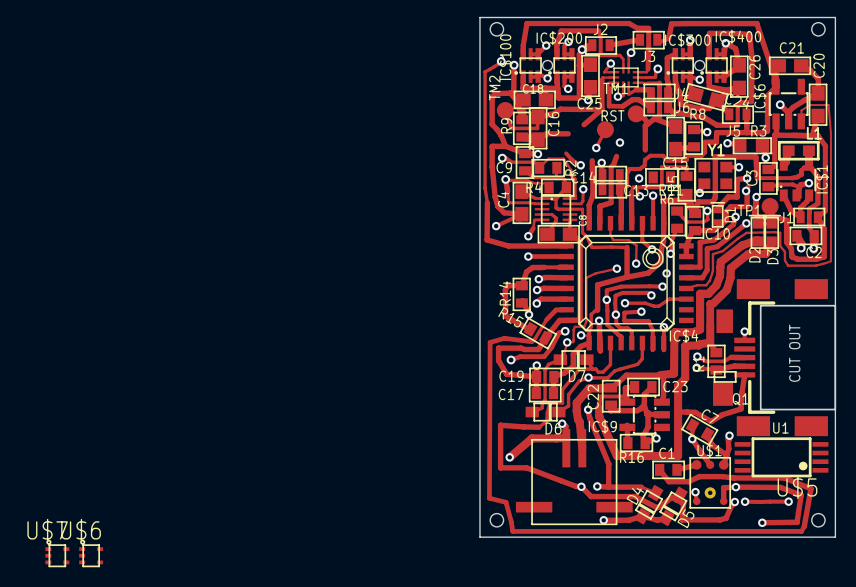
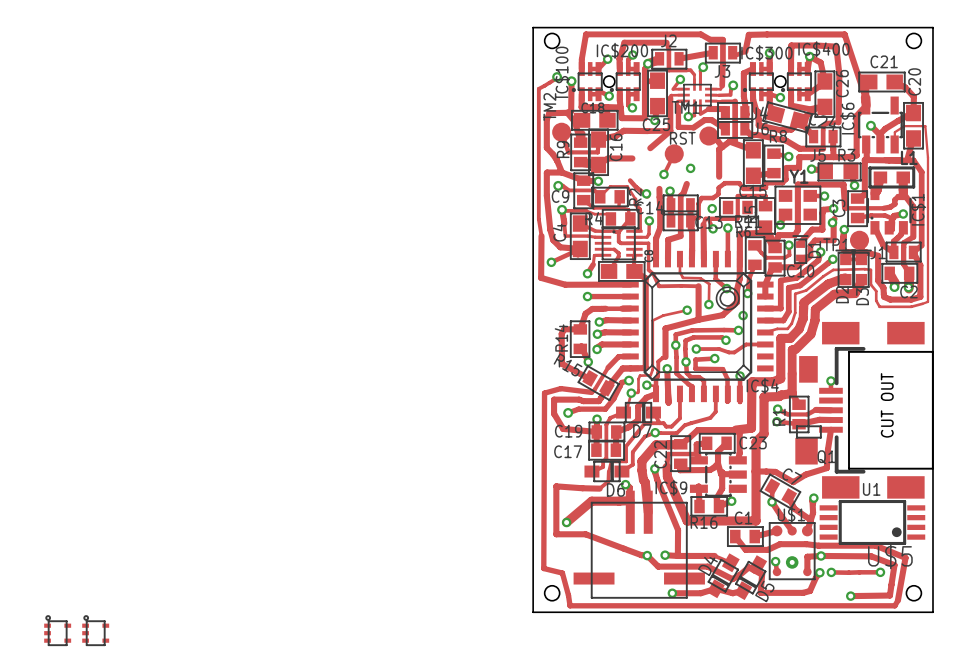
U$7 name: U$7 (47, 530) -> none
U$6 name: U$6 (81, 530) -> none

